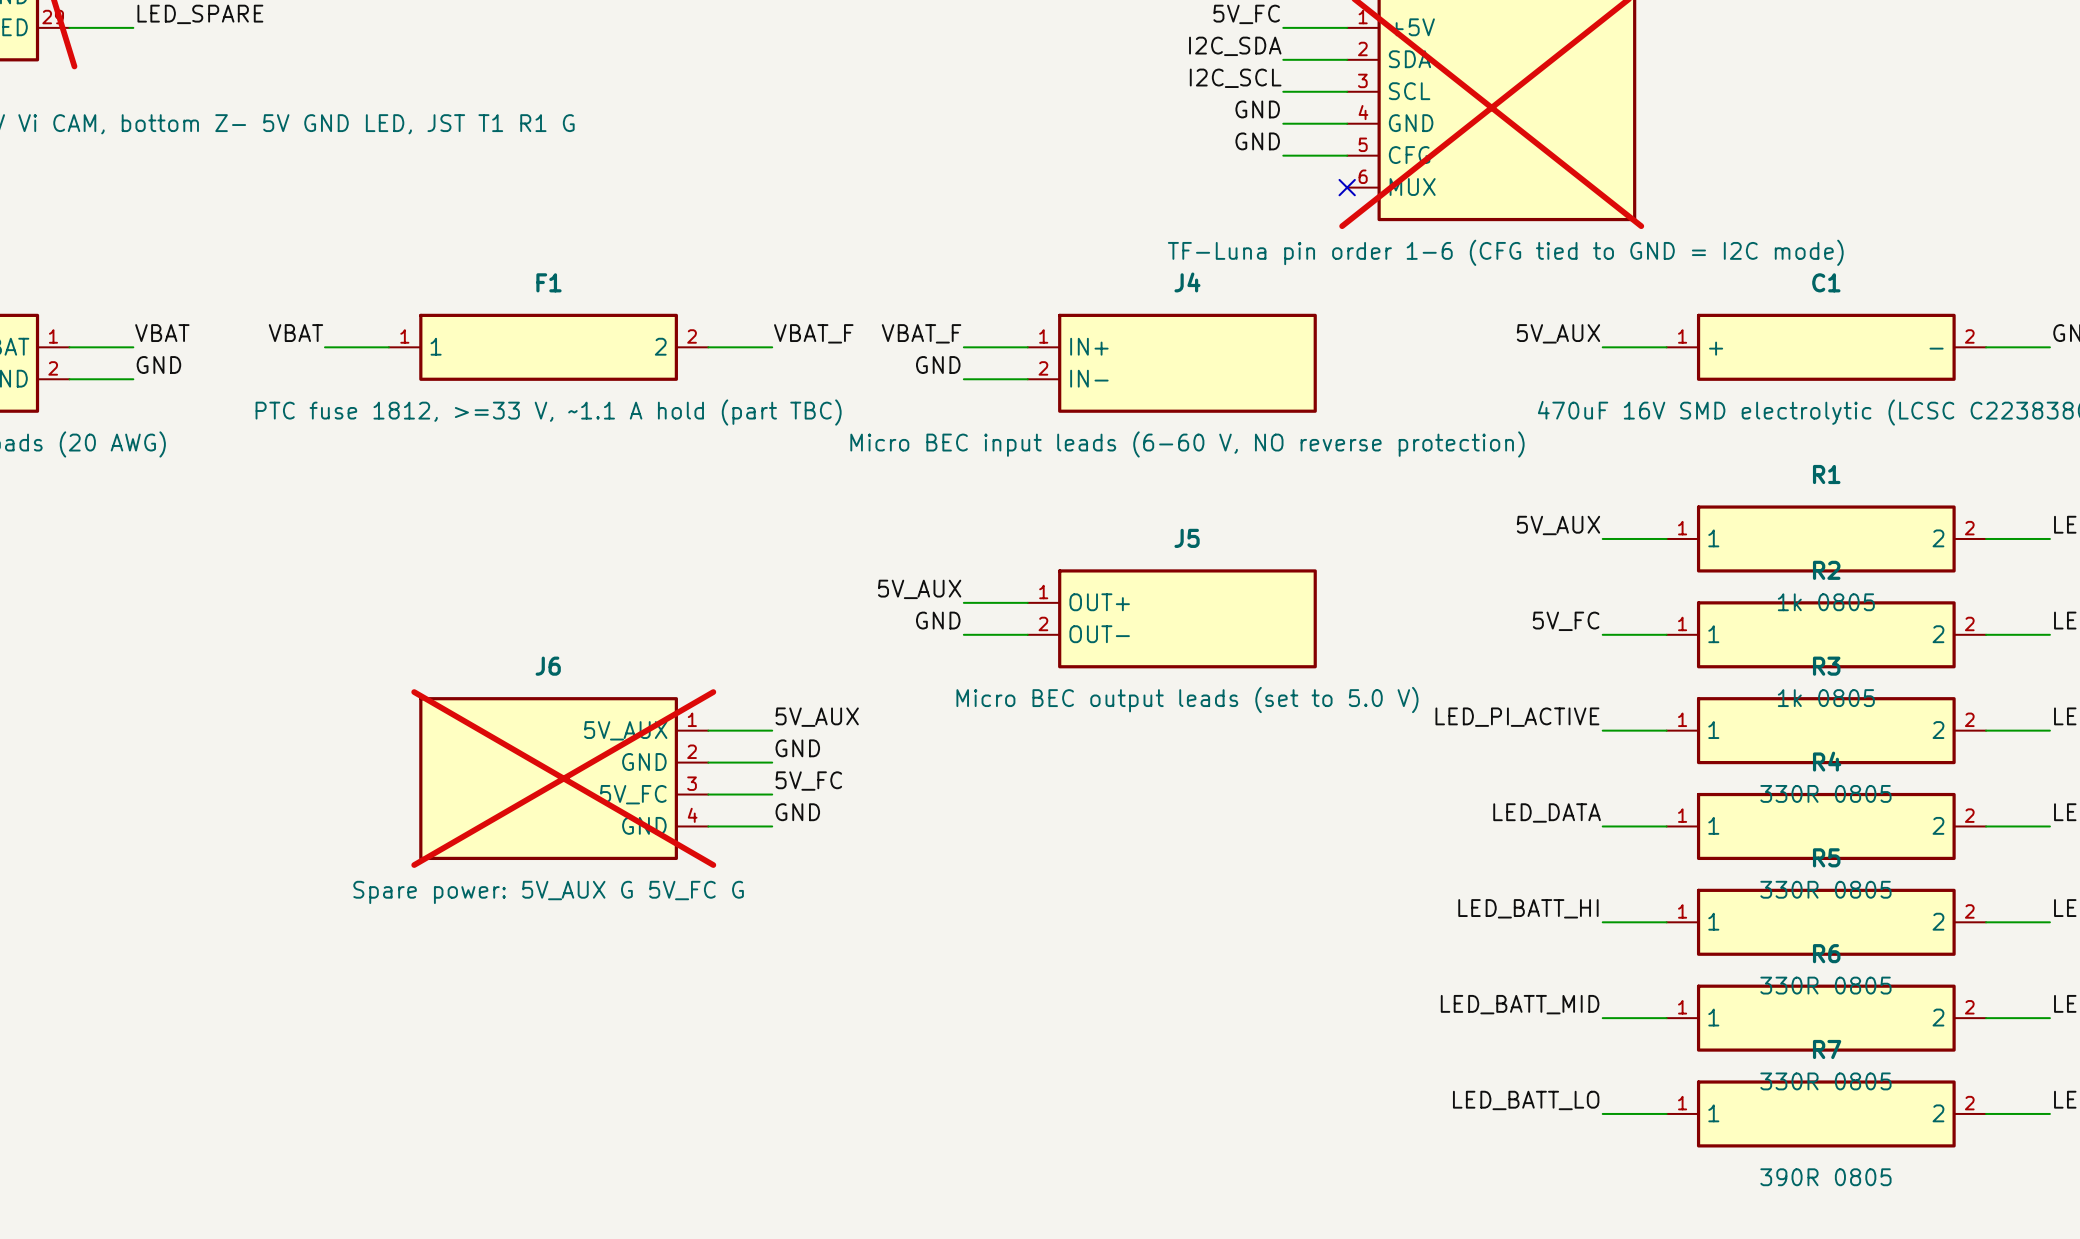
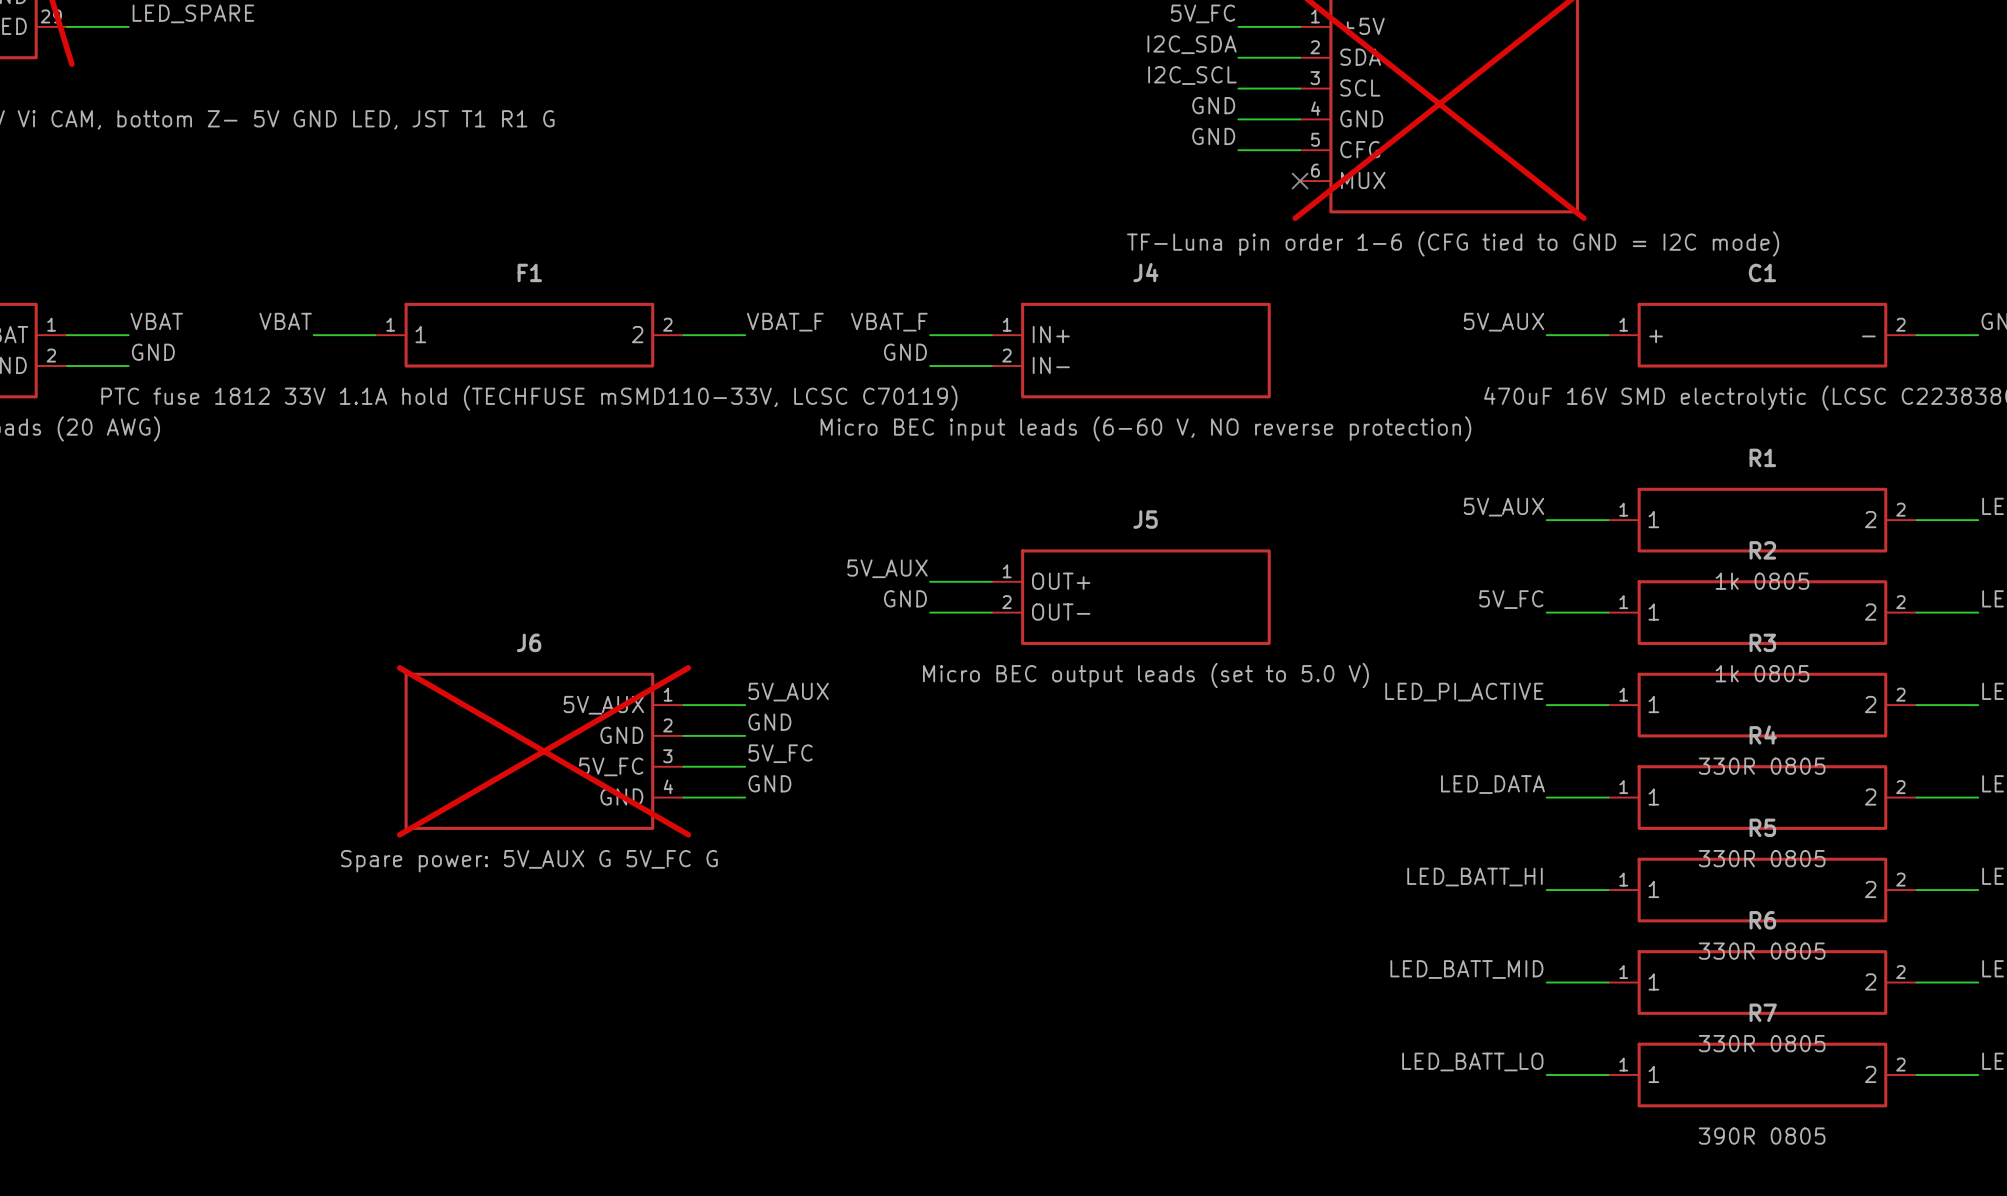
F1 value: PTC fuse 1812, >=33 V, ~1.1 A hold (part TBC) (548, 412) -> PTC fuse 1812 33V 1.1A hold (TECHFUSE mSMD110-33V, LCSC C70119) (529, 398)

